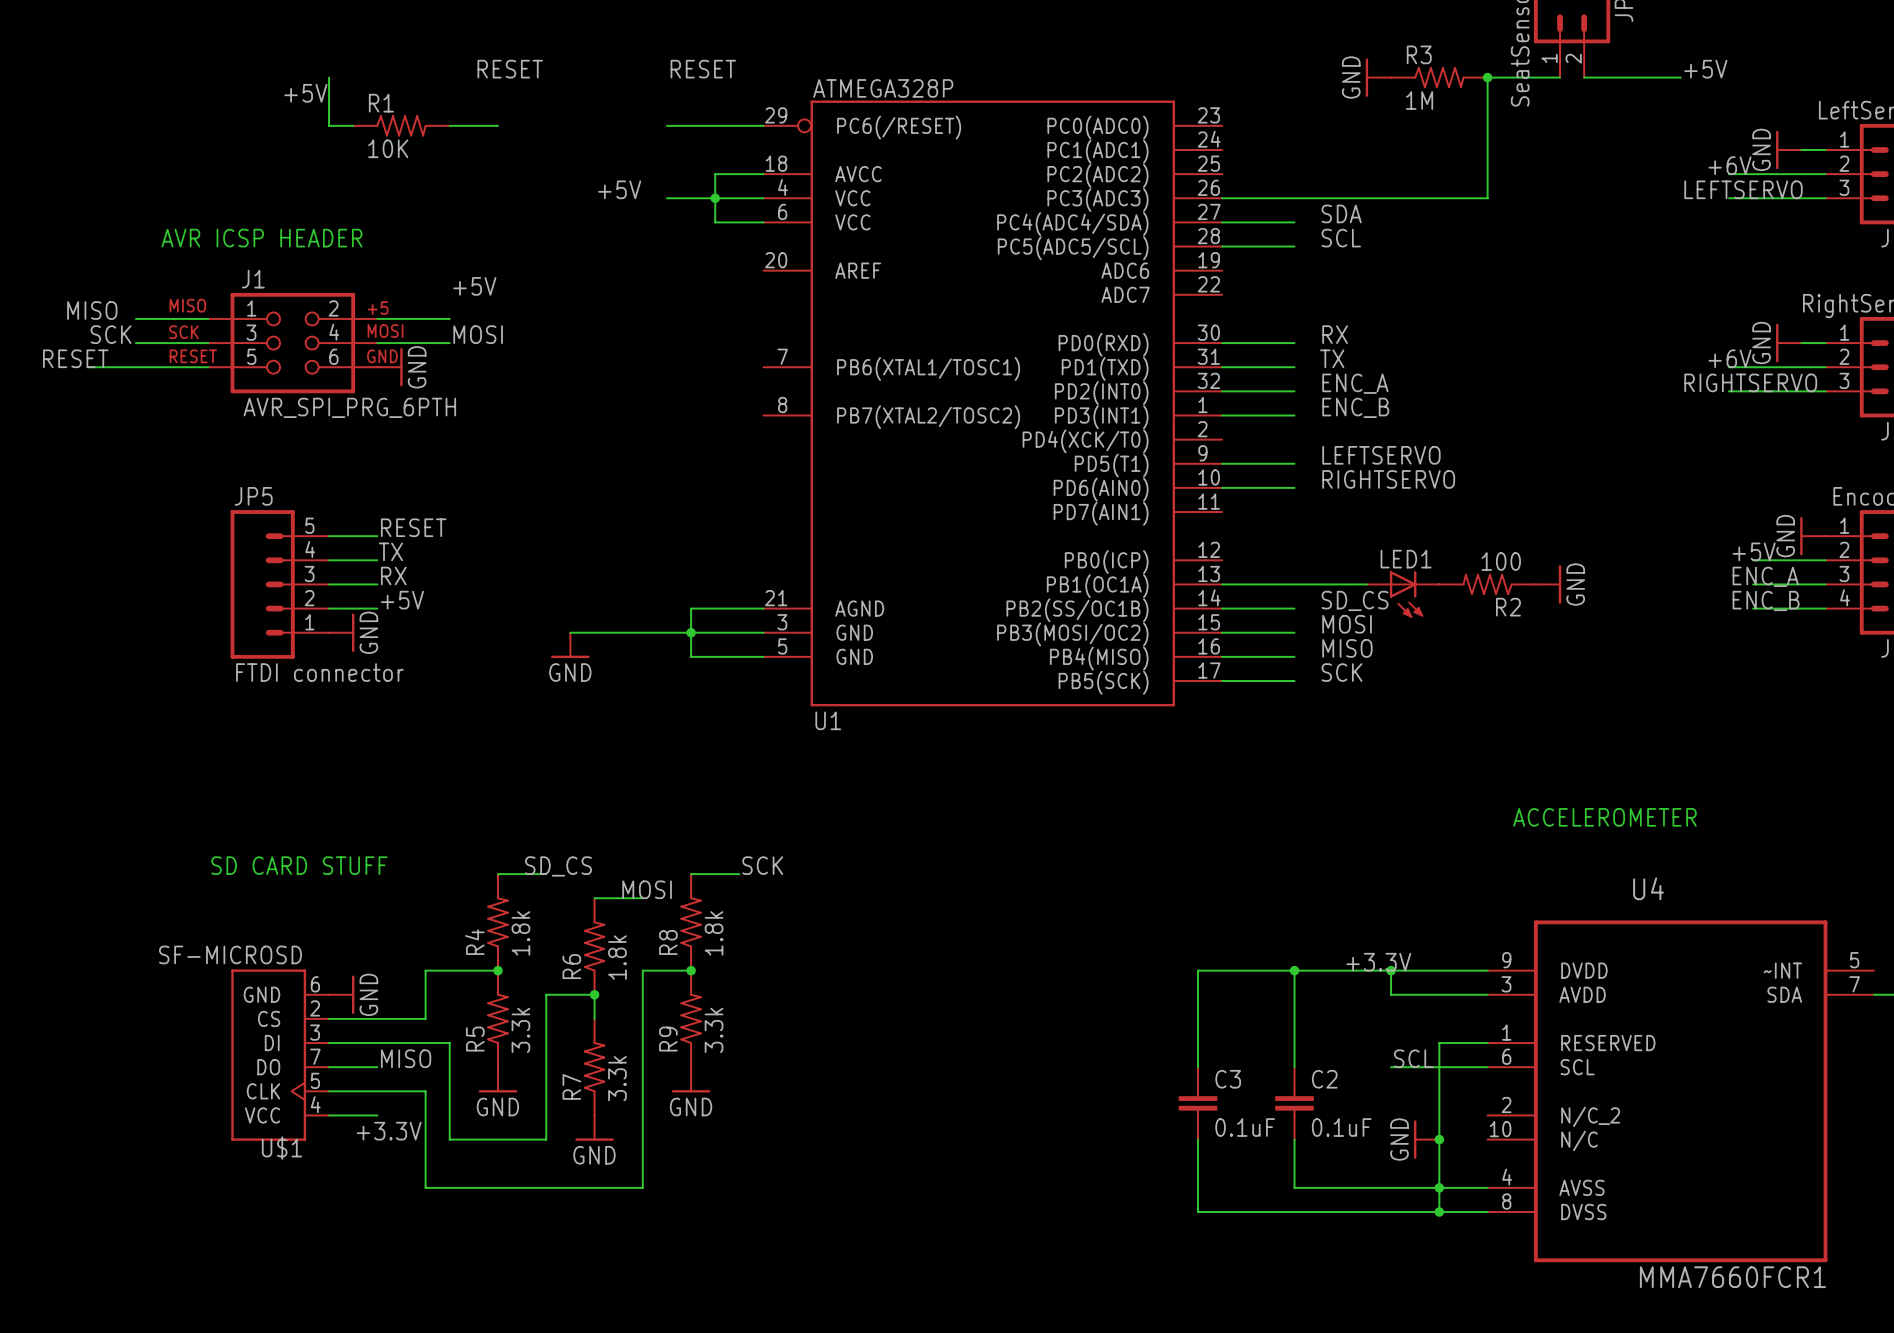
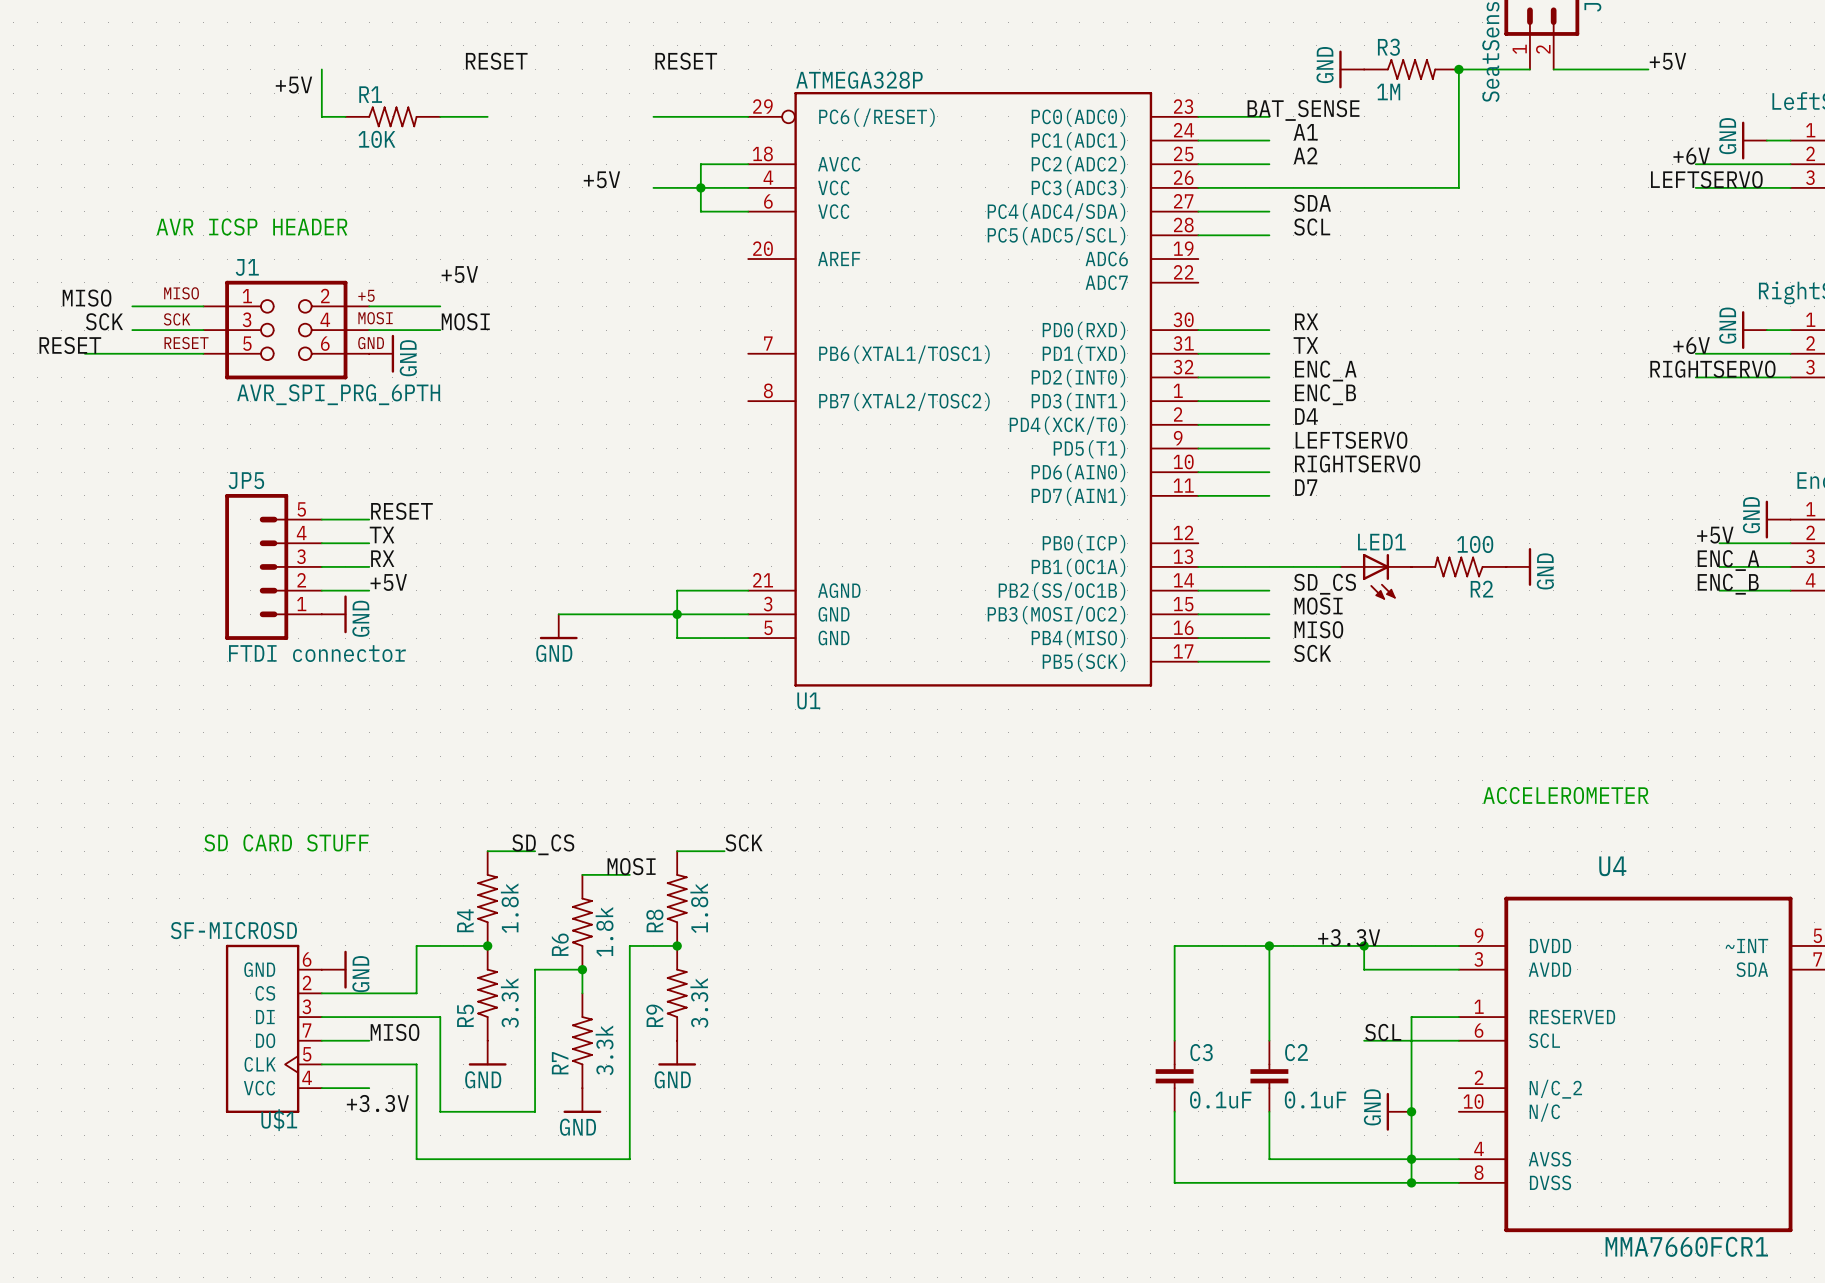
label: none -> BAT_SENSE (1303, 110)
wire: none -> (1198, 116) (1269, 116)
label: none -> A1 (1305, 132)
wire: none -> (1198, 140) (1269, 140)
label: none -> A2 (1305, 155)
wire: none -> (1198, 164) (1269, 164)
label: none -> D4 (1306, 416)
wire: none -> (1198, 424) (1269, 424)
label: none -> D7 (1306, 487)
wire: none -> (1198, 495) (1269, 495)

